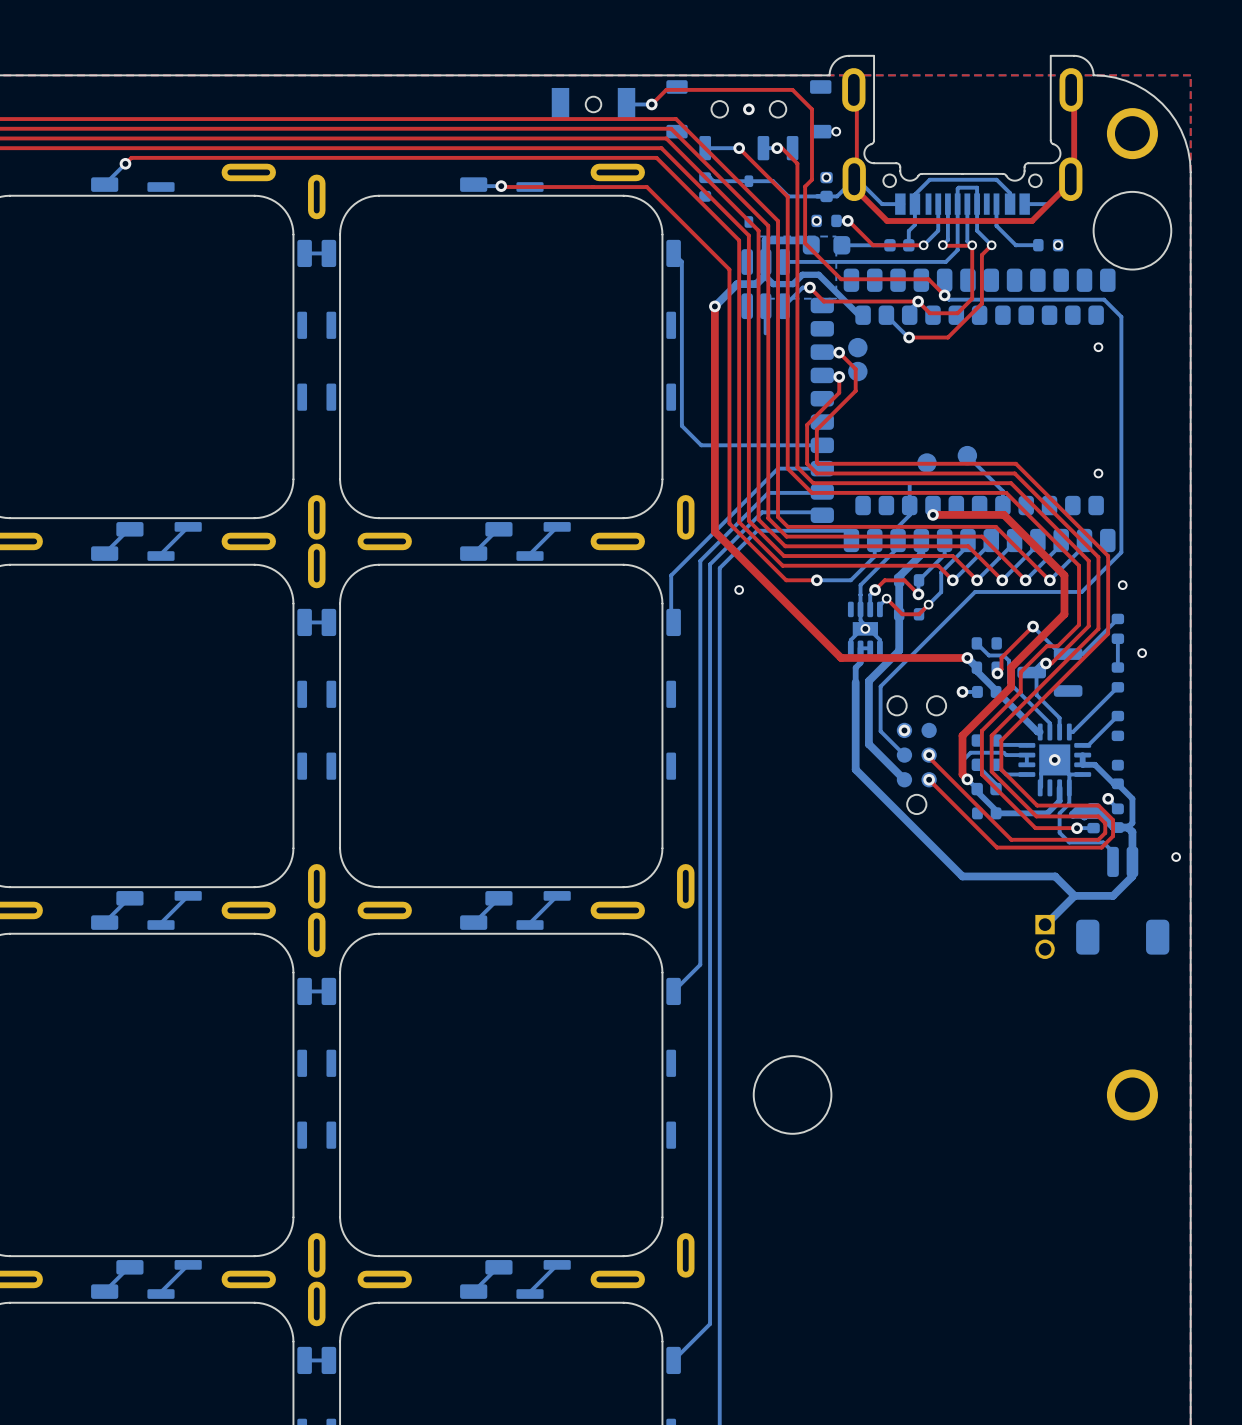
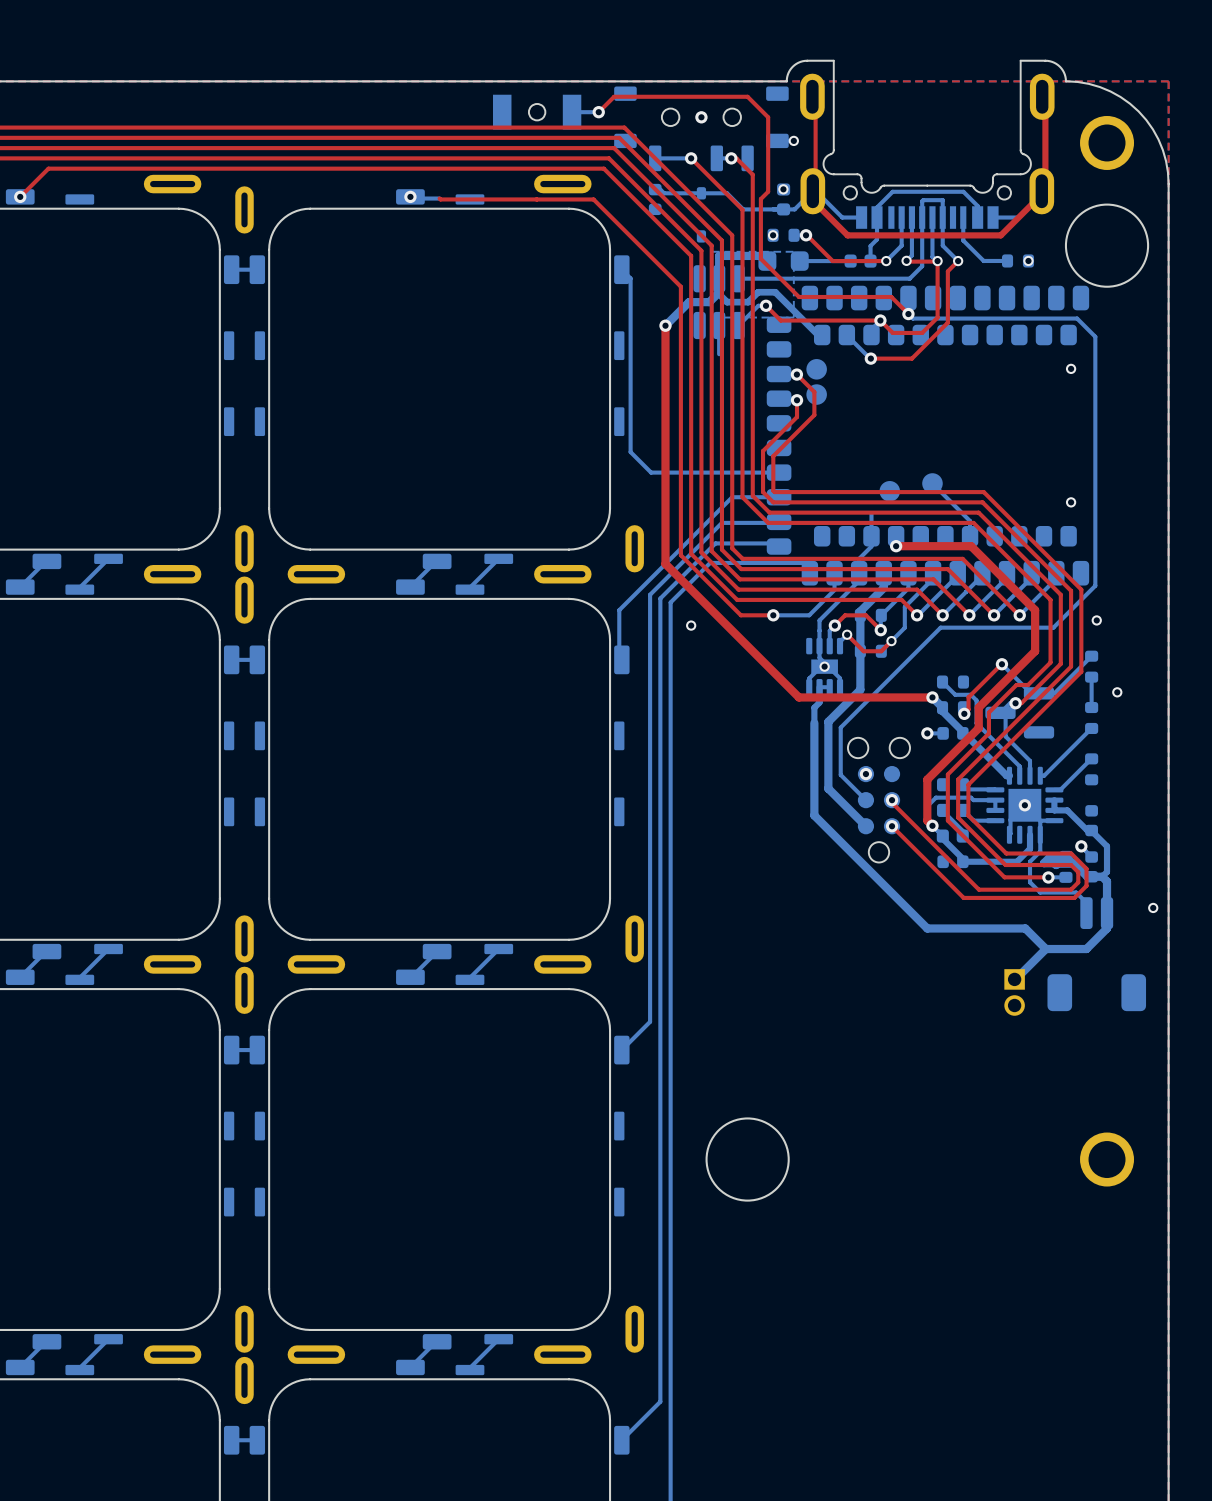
top track: none -> (42, 174) (20, 196)
bottom track: (125, 163) (104, 184) -> none
via position: (125, 163) -> (20, 196)
via position: (501, 186) -> (410, 196)

